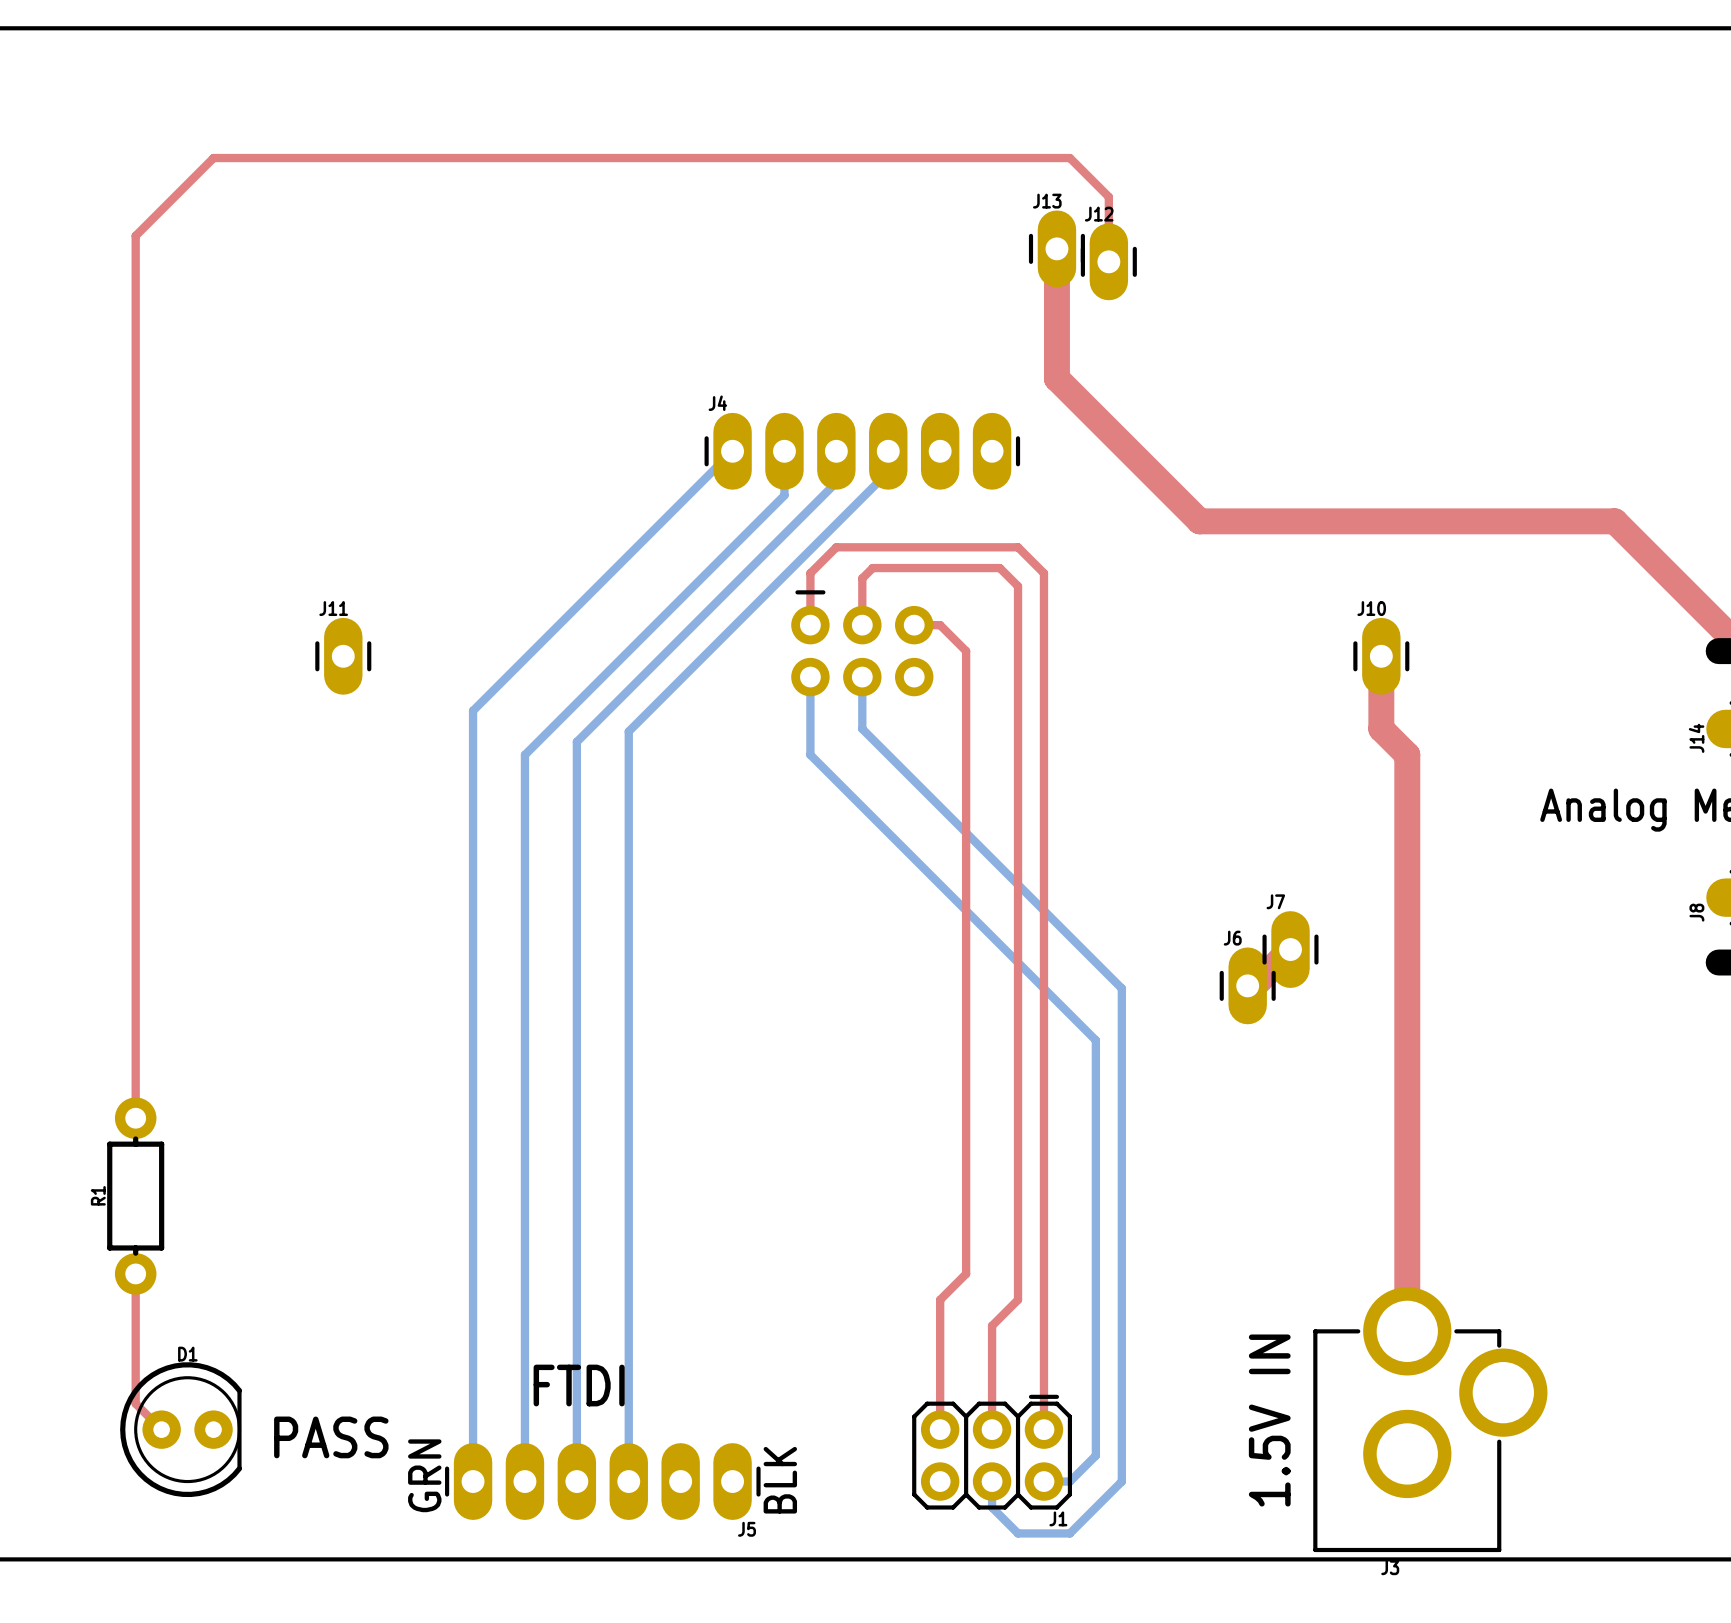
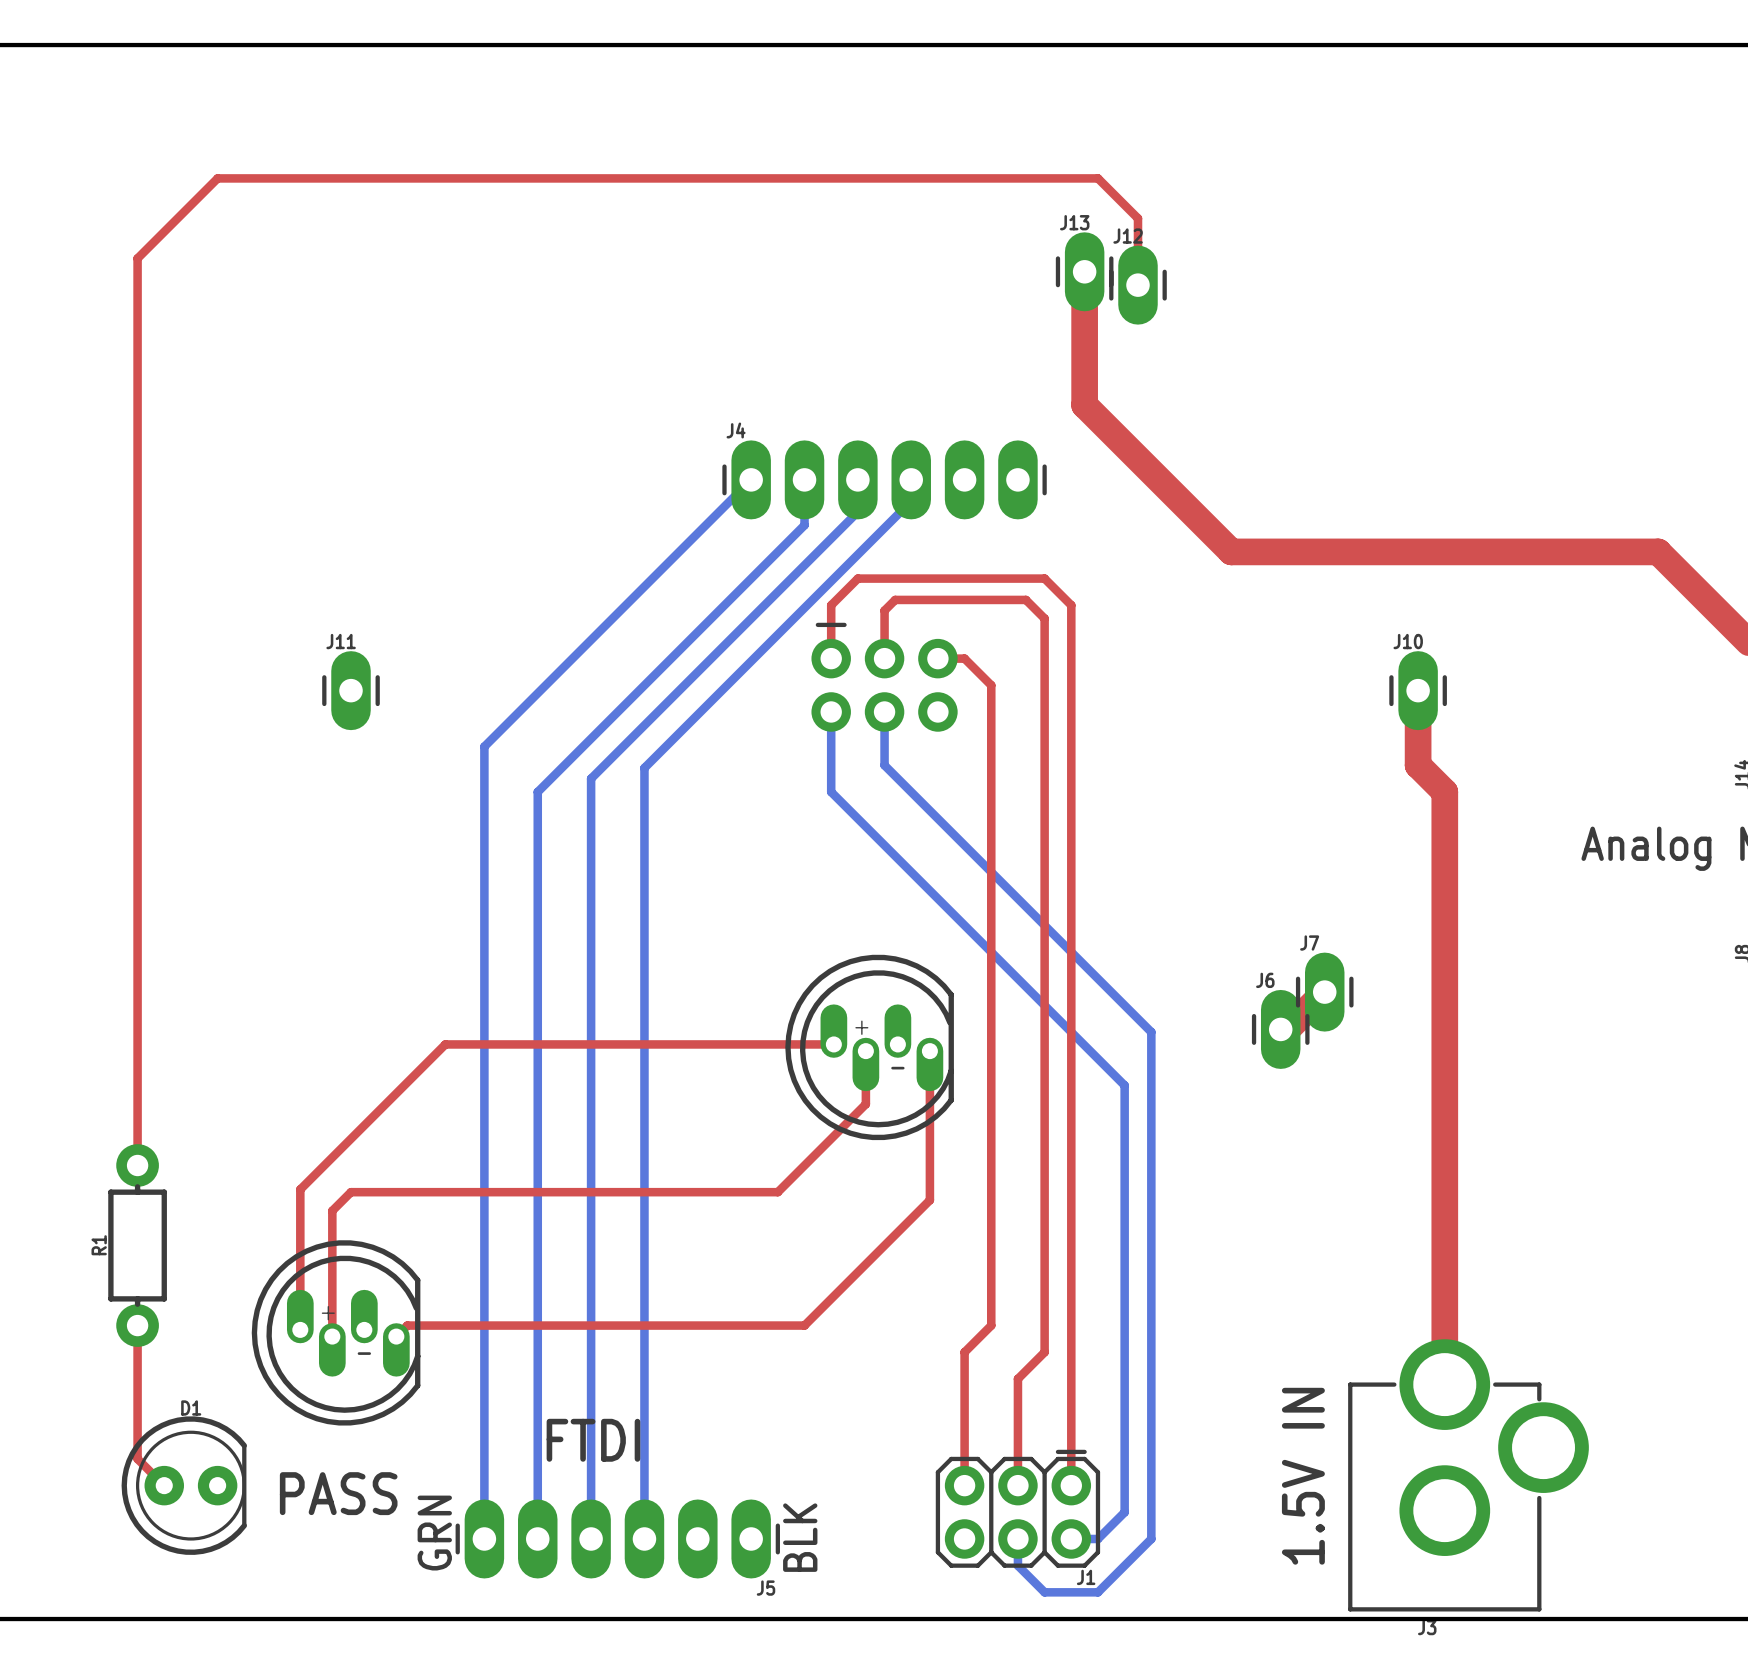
top track: none -> (833, 1044) (445, 1044) (300, 1189) (300, 1329)
part: none -> (869, 1047)
top track: none -> (865, 1051) (865, 1104) (777, 1192) (351, 1192) (332, 1210) (332, 1336)
top track: none -> (929, 1051) (929, 1200) (804, 1325) (407, 1325) (396, 1336)
part: none -> (336, 1332)

